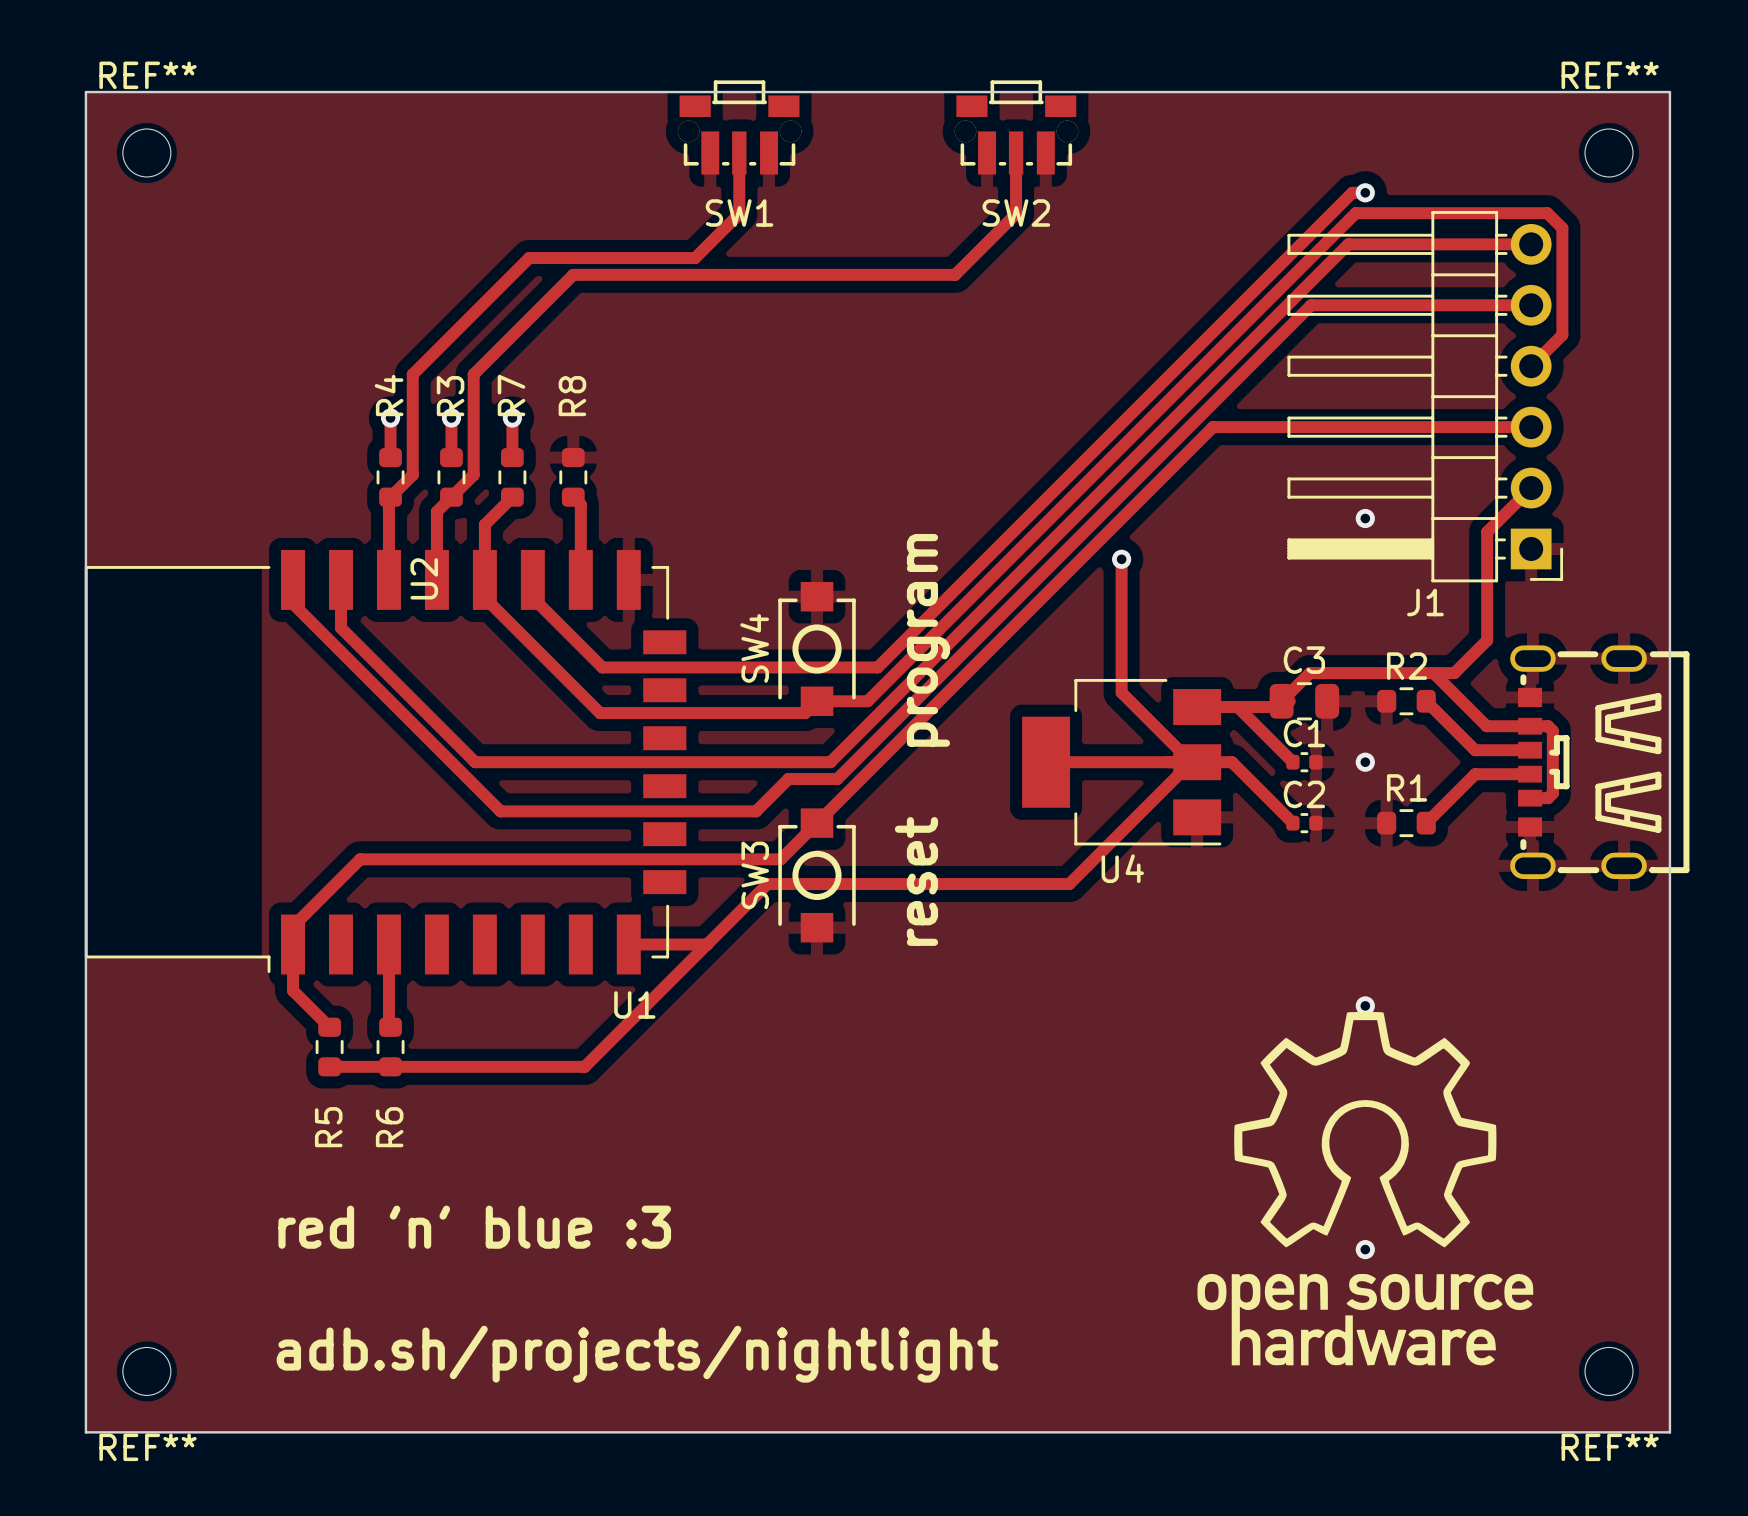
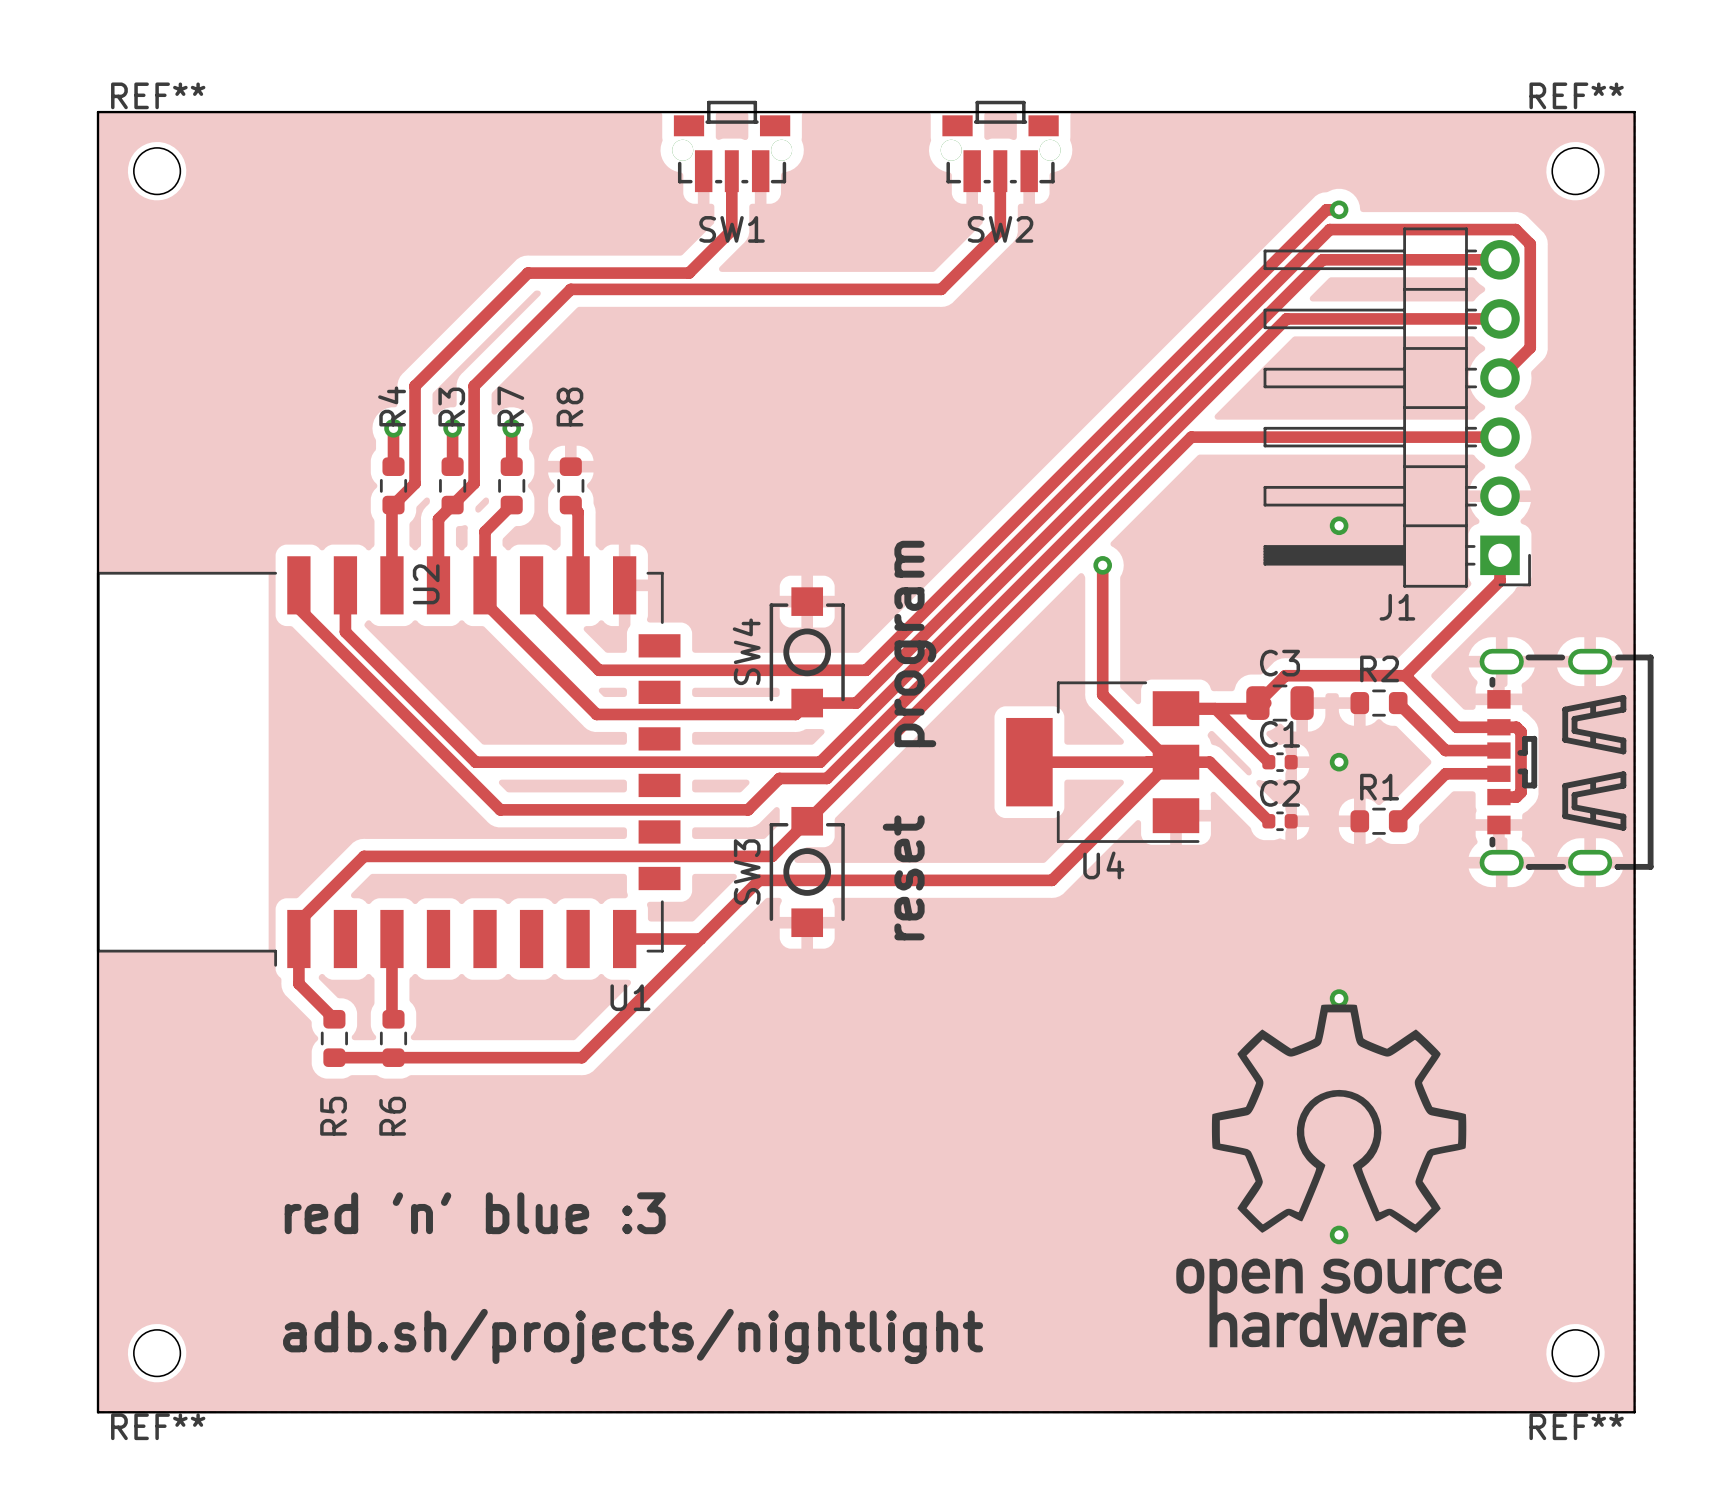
track: (1531, 488) (1487, 532) (1487, 640) (1454, 673) (1433, 673) -> (1499, 555) (1499, 581) (1405, 675)

